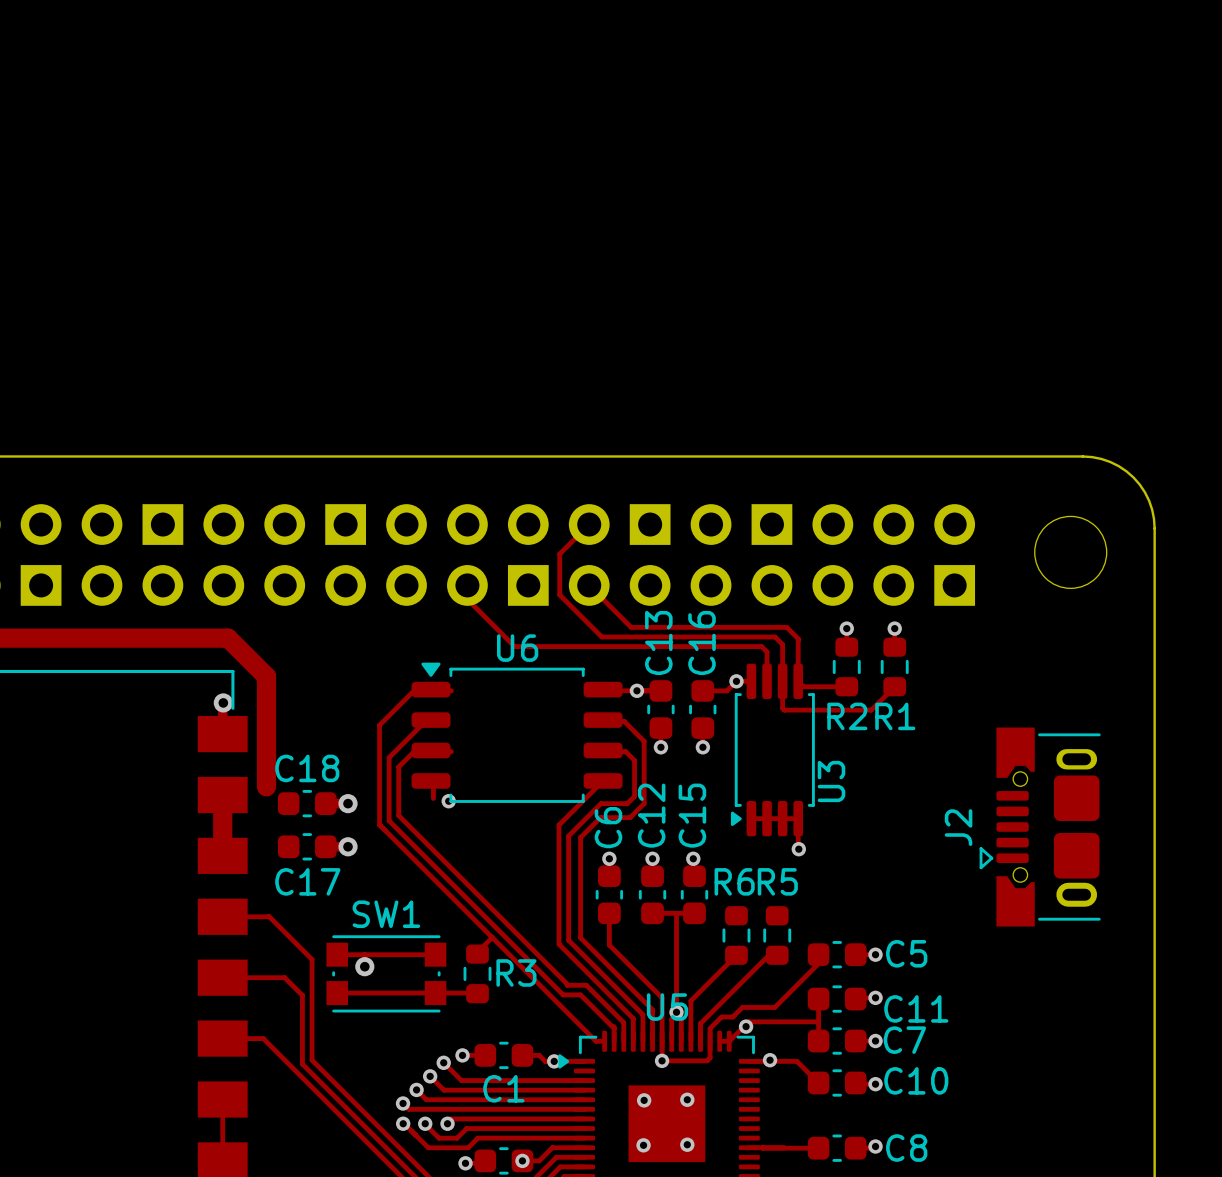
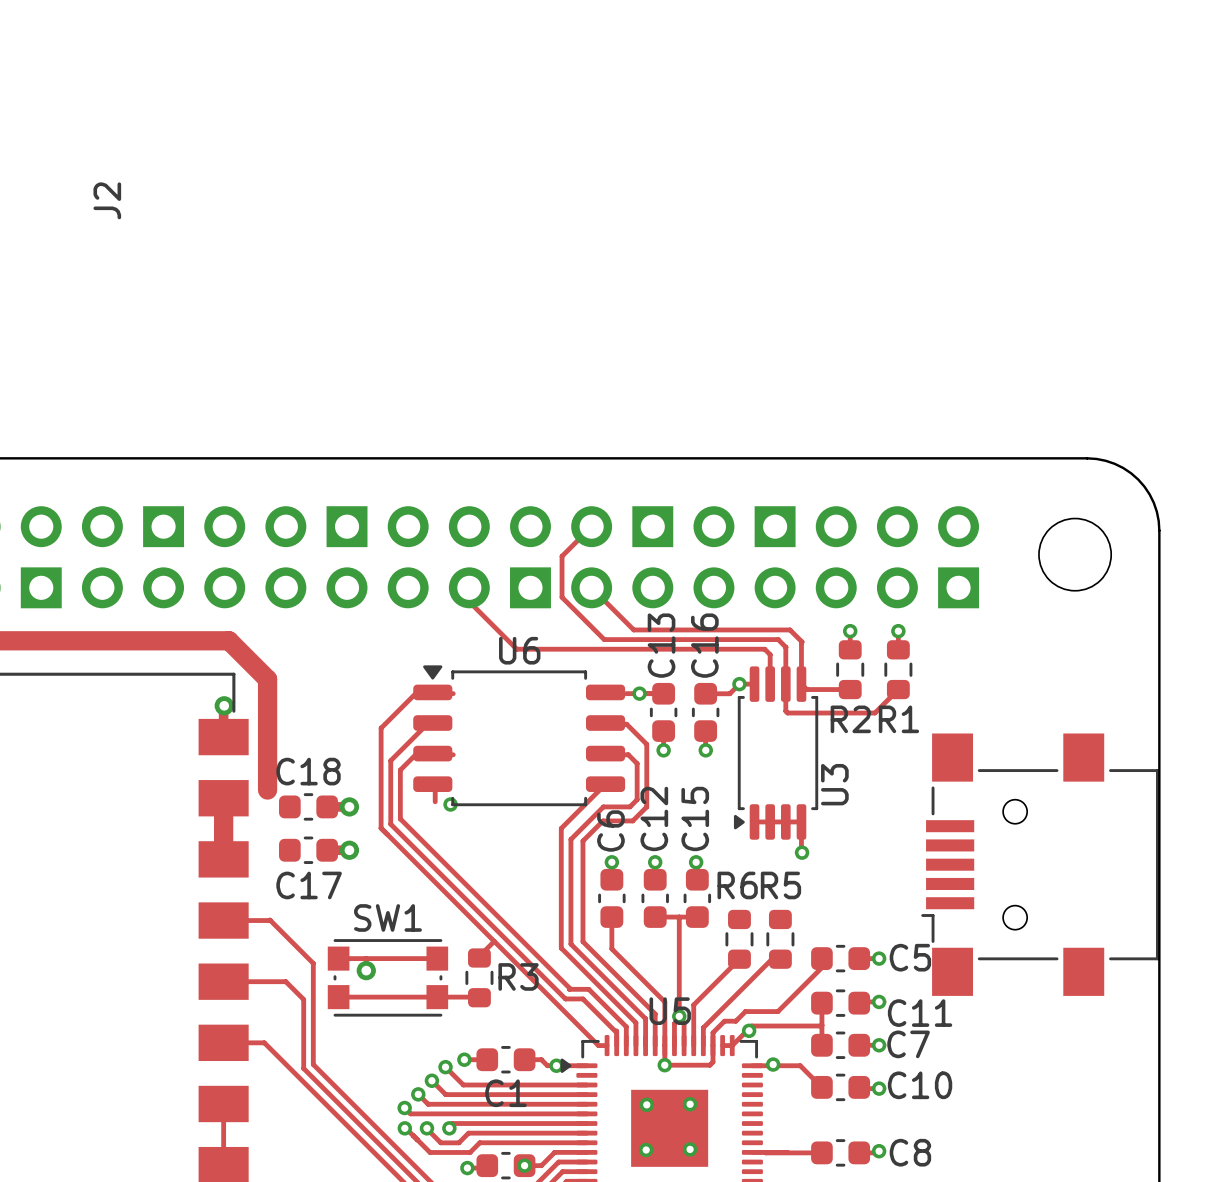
J2 footprint: [979, 727, 1101, 927] -> [921, 733, 1159, 996]
J2 name position: J2 (958, 827) -> J2 (107, 200)

